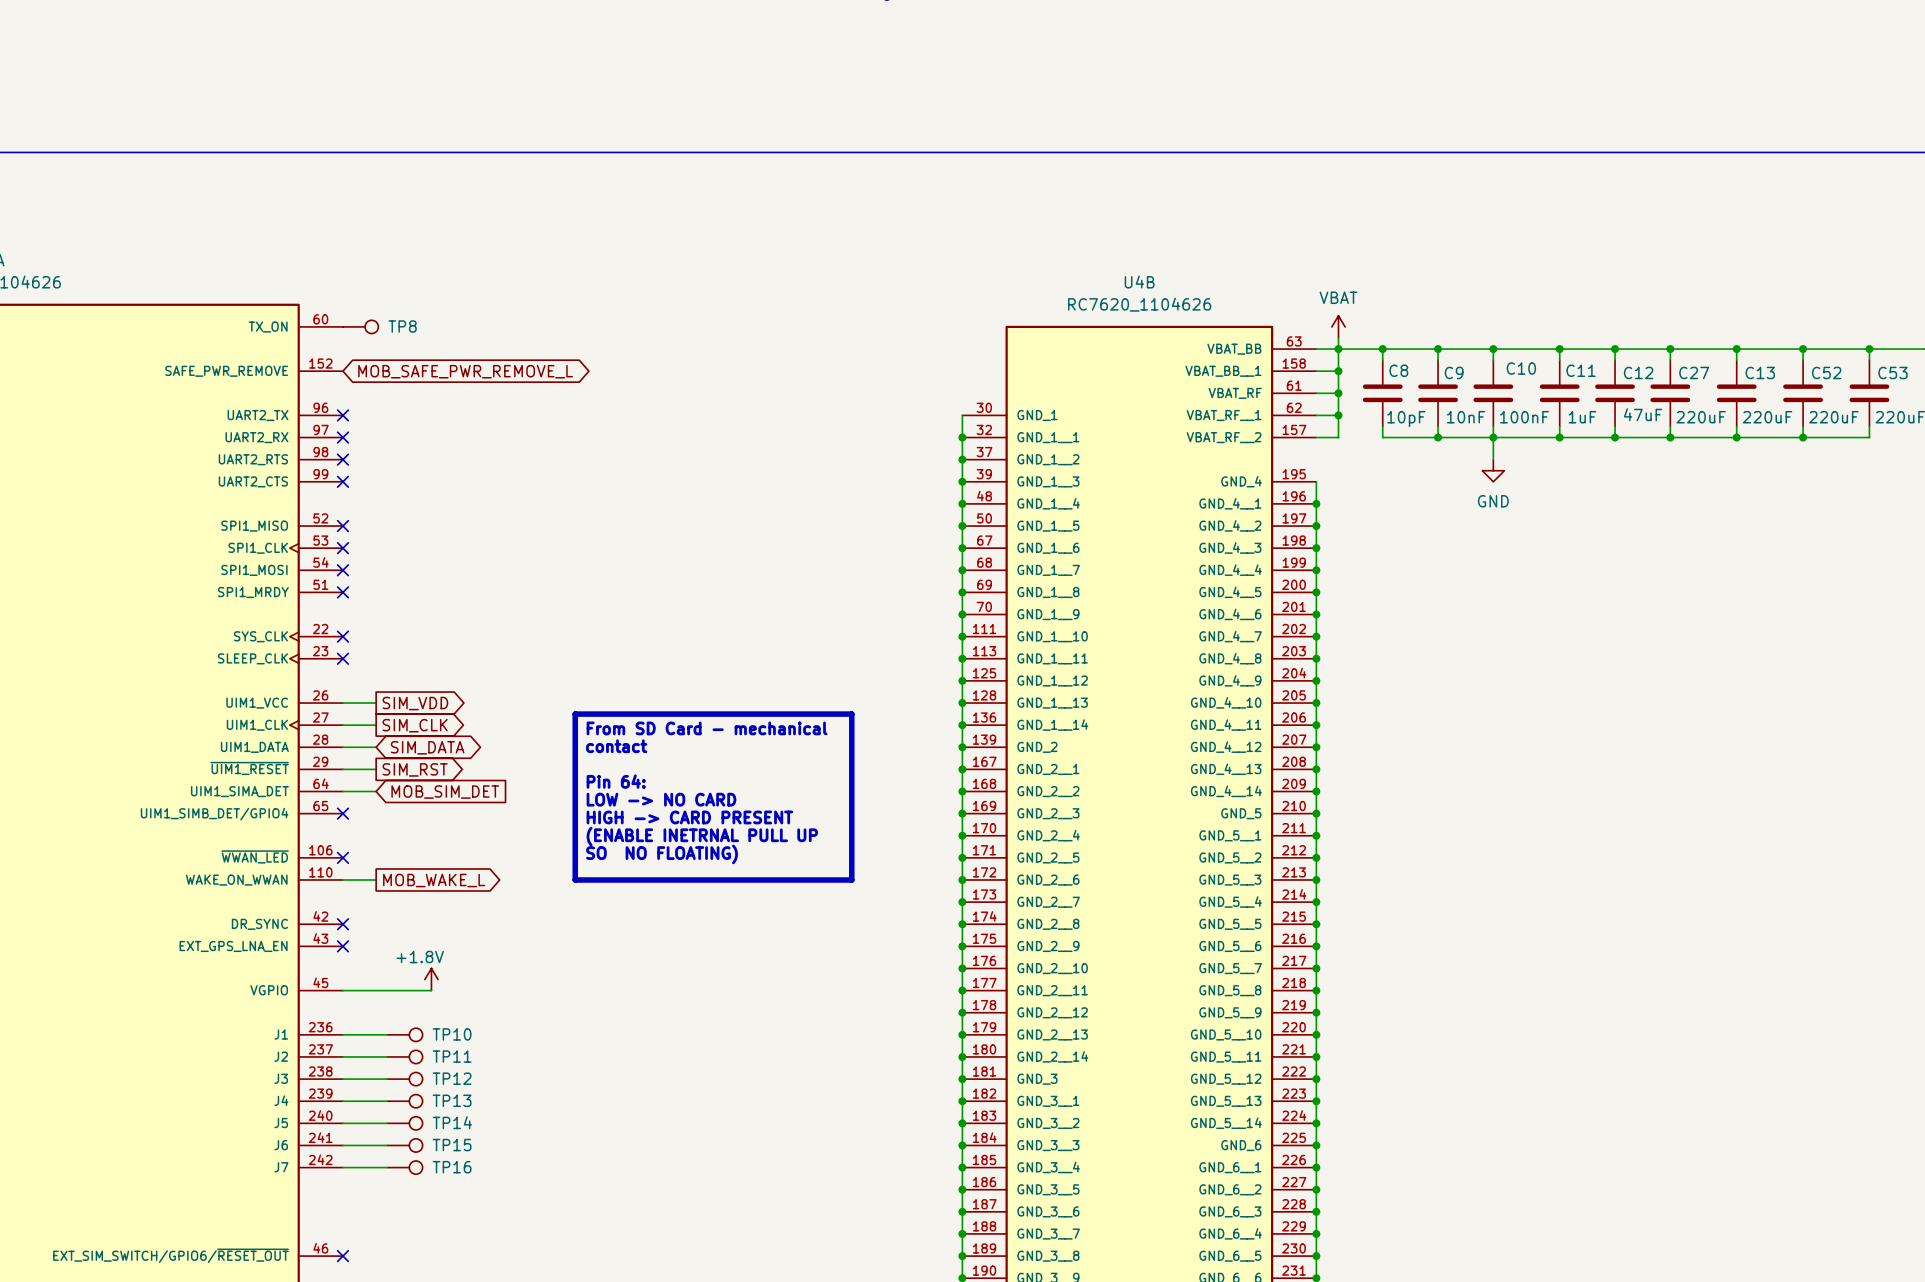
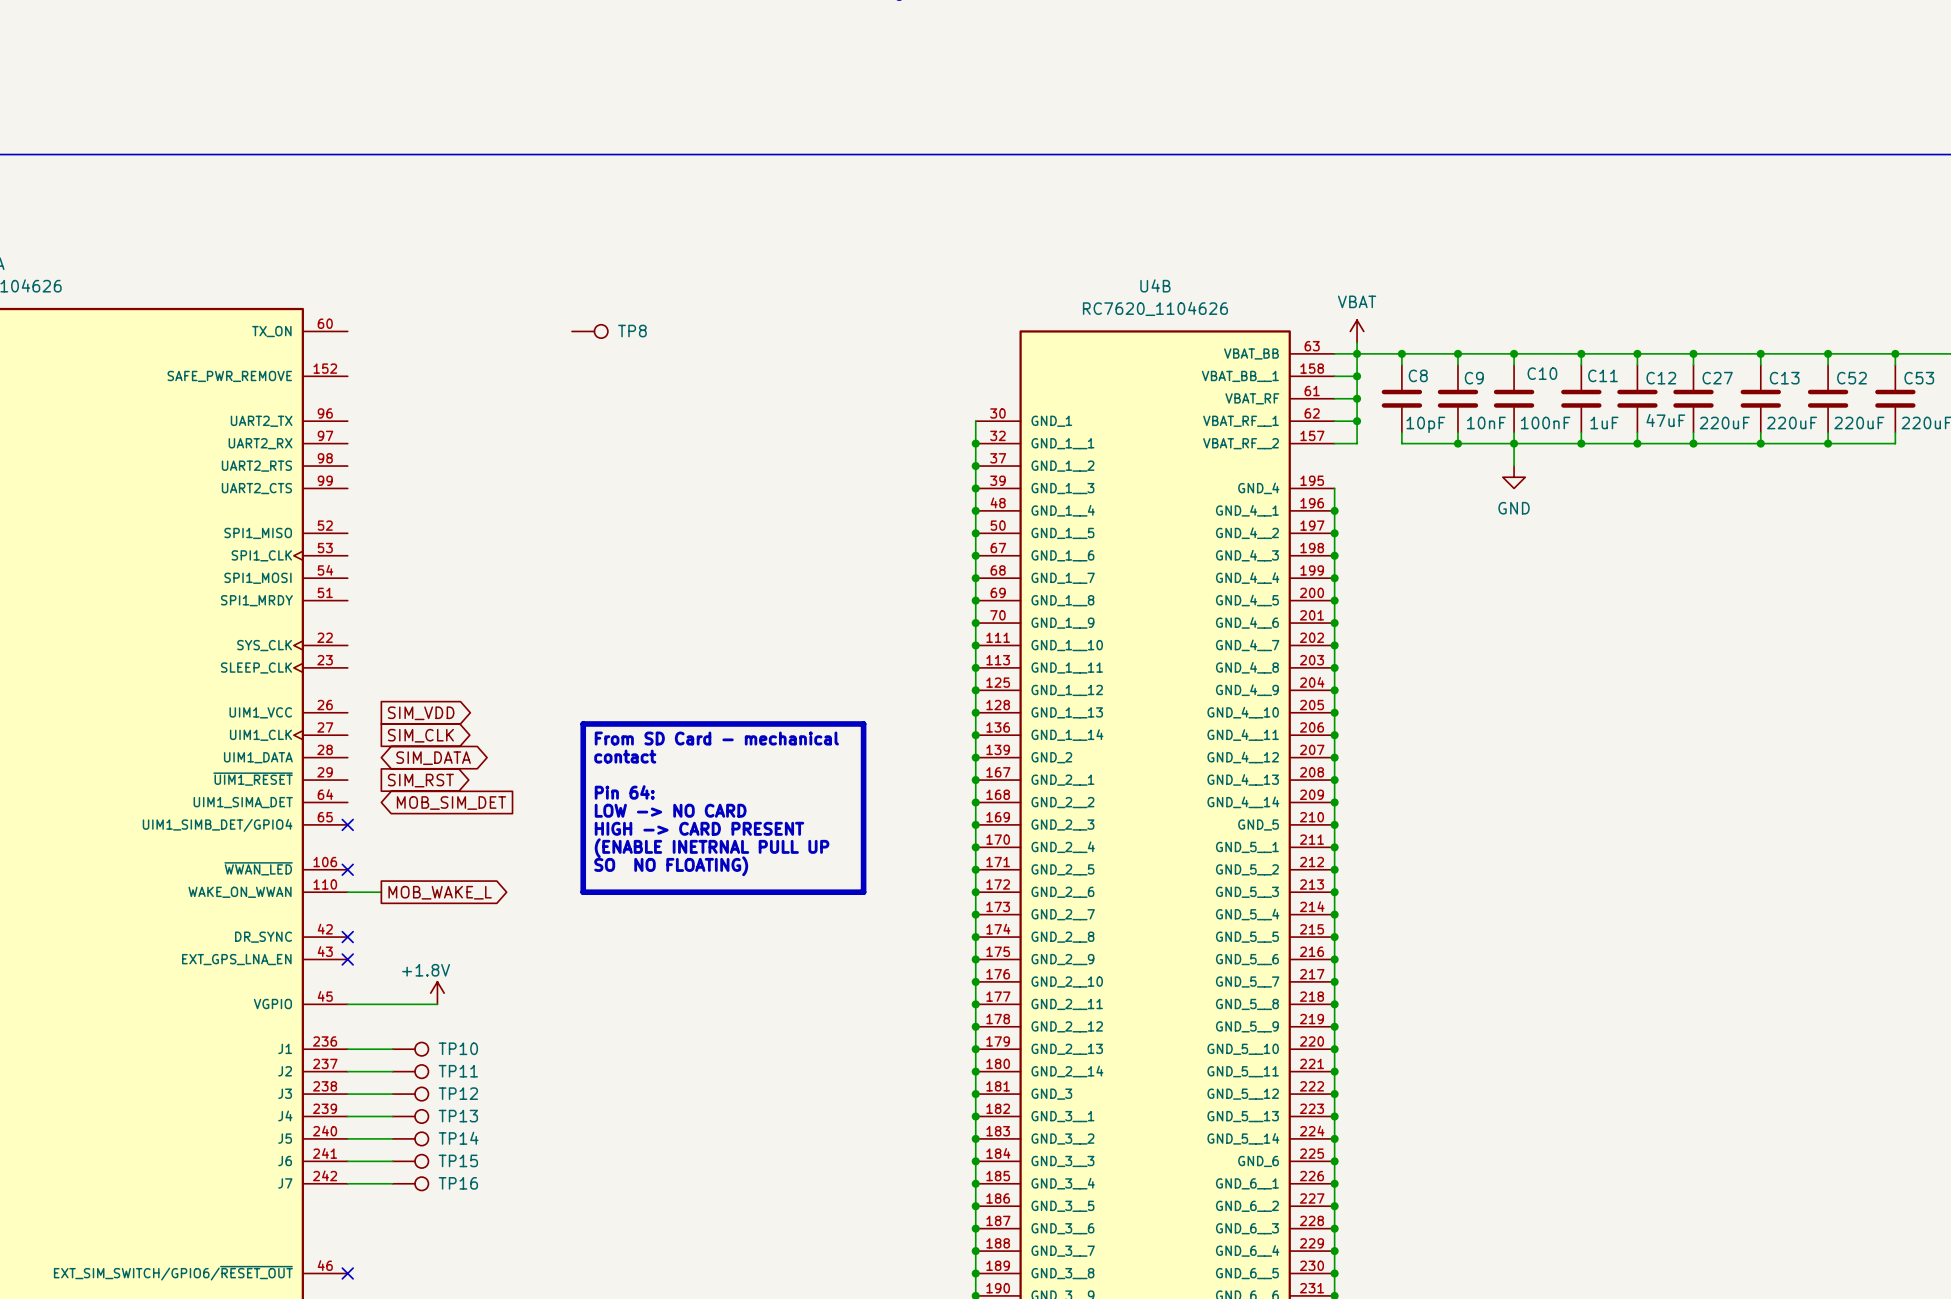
TP8 position: (360, 326) -> (589, 331)
global label: MOB_SAFE_PWR_REMOVE_L (465, 371) -> none
no-connect mark: (342, 415) -> none
no-connect mark: (342, 437) -> none
no-connect mark: (342, 459) -> none
no-connect mark: (342, 481) -> none
no-connect mark: (342, 526) -> none
no-connect mark: (342, 548) -> none
no-connect mark: (342, 570) -> none
no-connect mark: (342, 592) -> none
no-connect mark: (342, 636) -> none
no-connect mark: (342, 658) -> none
wire: (342, 703) (376, 703) -> none
wire: (342, 725) (376, 725) -> none
wire: (342, 747) (376, 747) -> none
wire: (342, 769) (376, 769) -> none
wire: (342, 791) (376, 791) -> none

